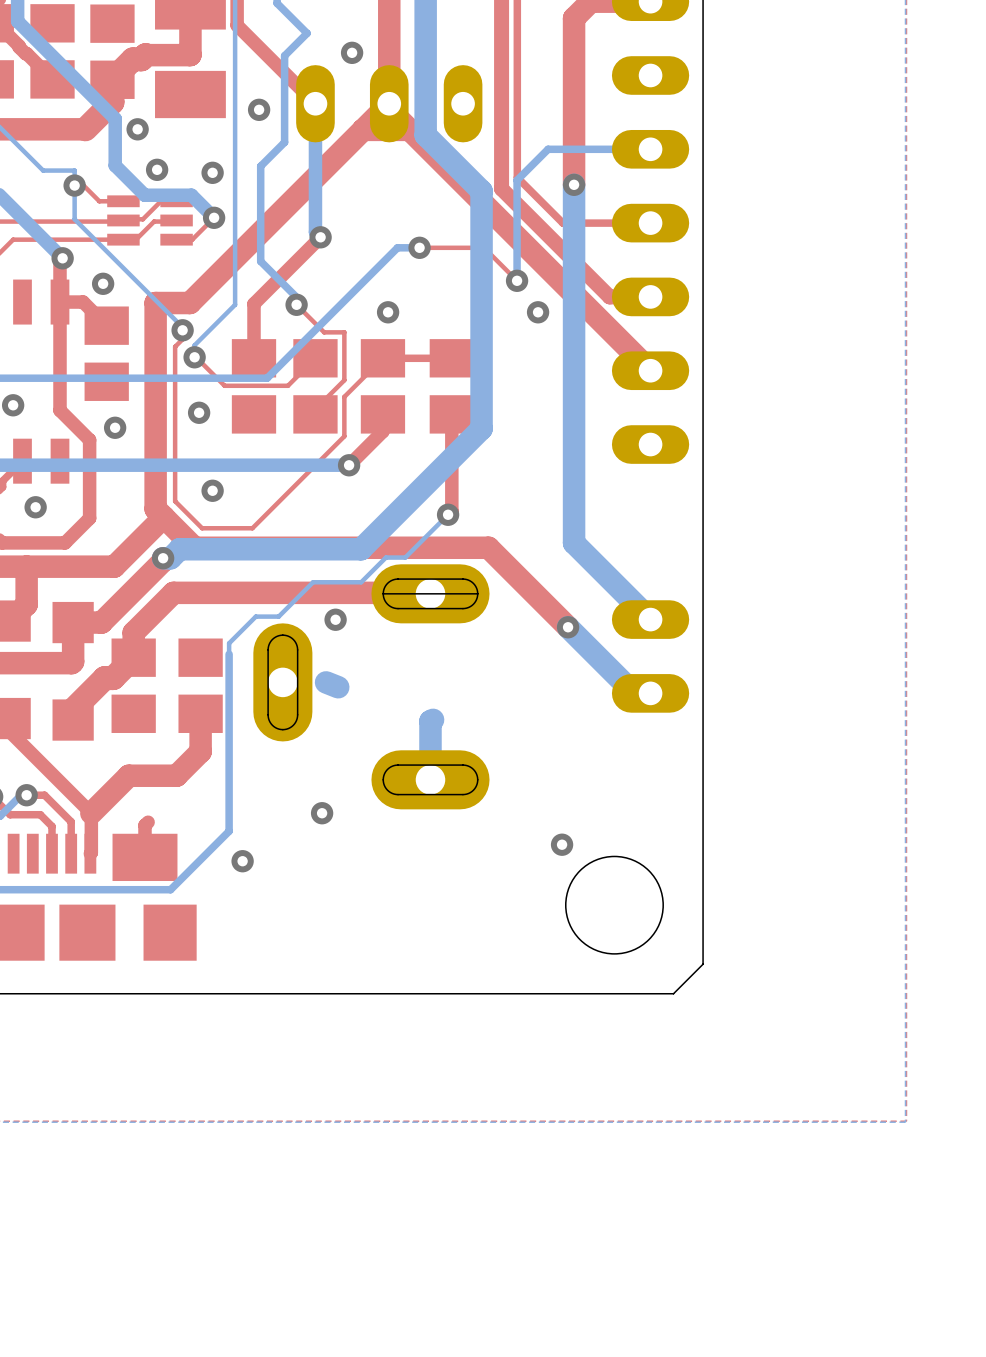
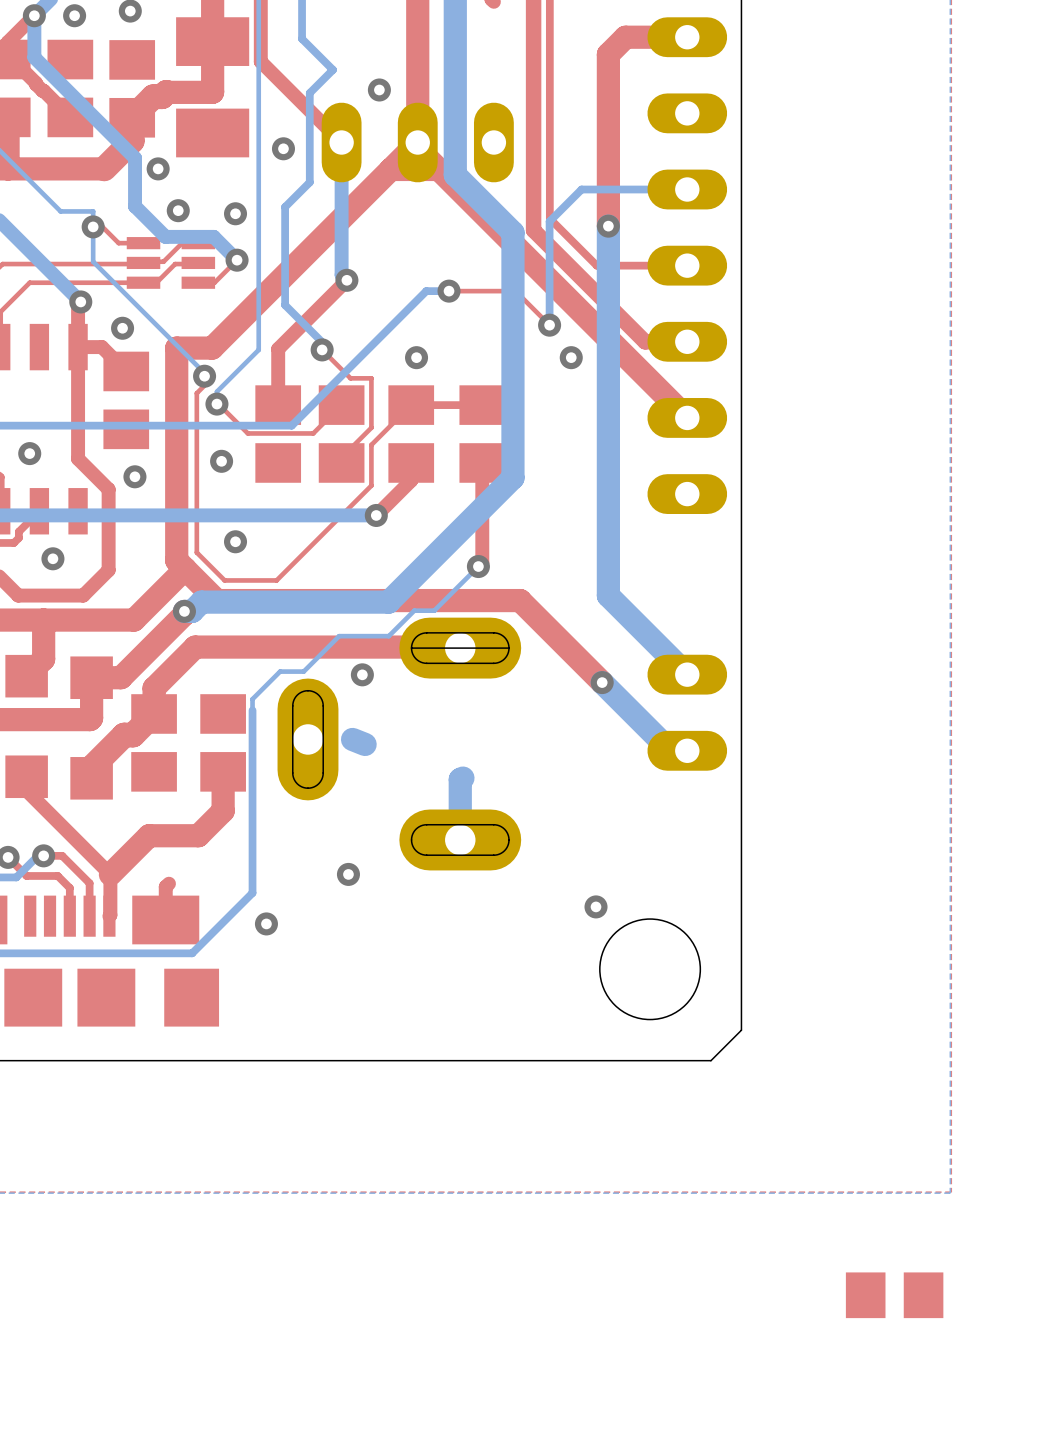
part: none -> (894, 1295)

